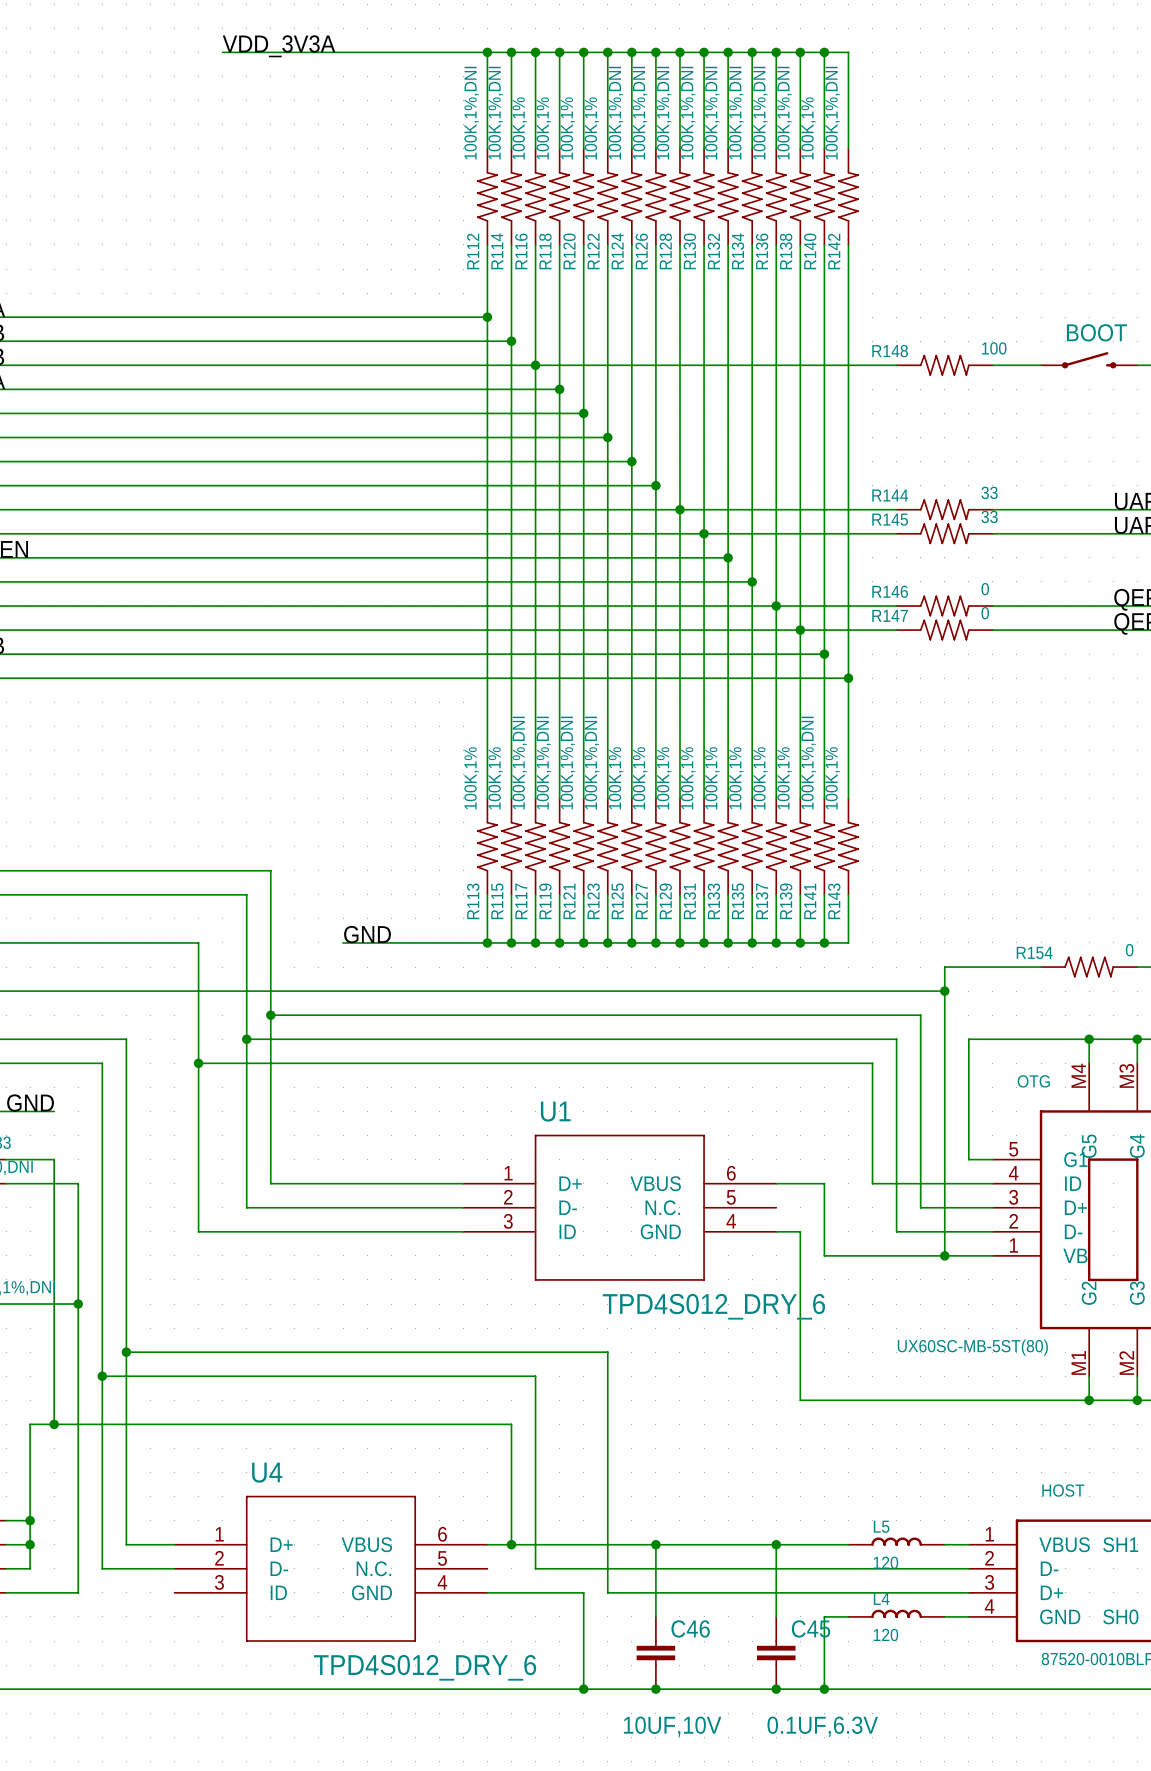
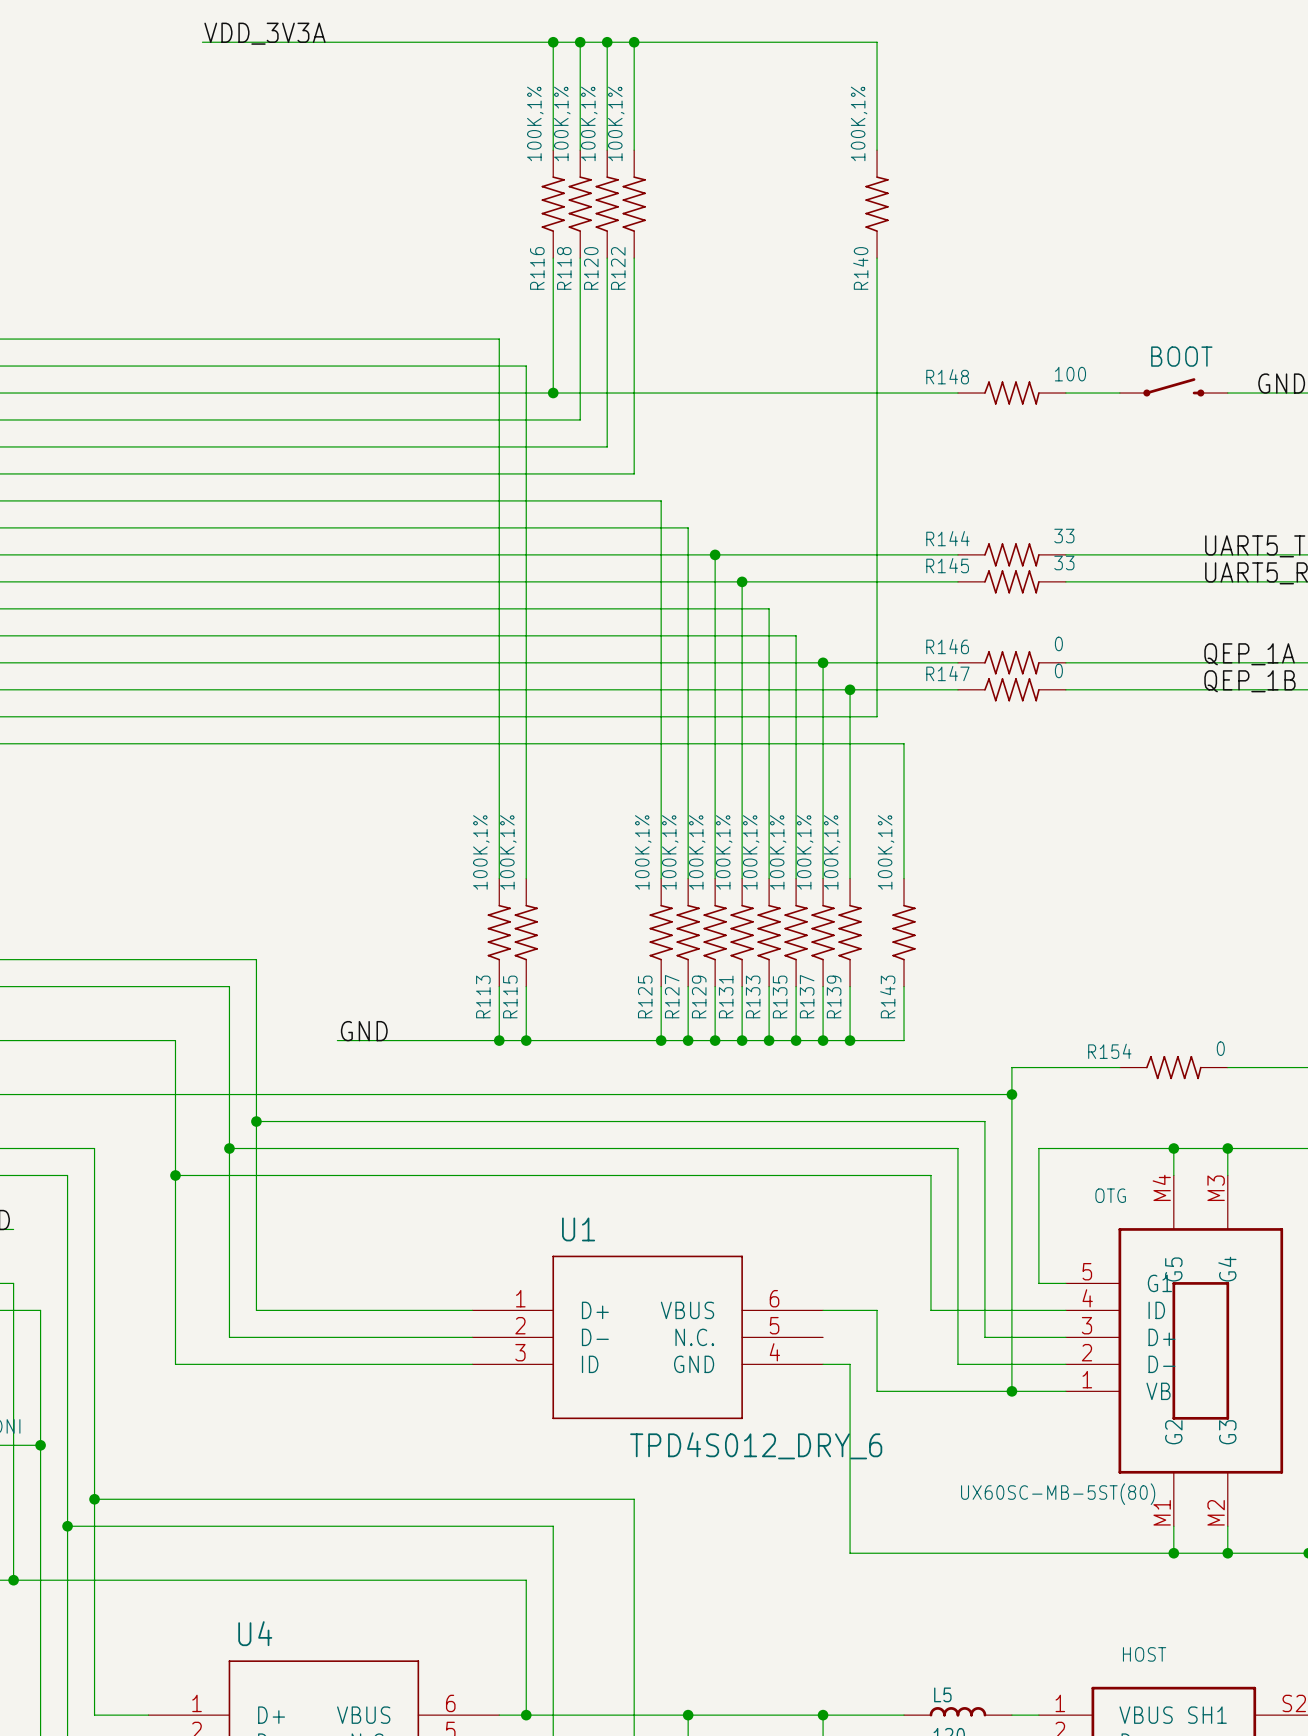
wire: (487, 52) (487, 148) -> none
junction: (487, 52) -> none
wire: (511, 52) (511, 148) -> none
junction: (511, 52) -> none
wire: (631, 52) (631, 148) -> none
junction: (631, 52) -> none
wire: (655, 52) (655, 148) -> none
junction: (655, 52) -> none
wire: (679, 52) (679, 148) -> none
junction: (679, 52) -> none
wire: (704, 52) (704, 148) -> none
junction: (704, 52) -> none
wire: (728, 52) (728, 148) -> none
junction: (728, 52) -> none
wire: (752, 52) (752, 148) -> none
junction: (752, 52) -> none
wire: (776, 52) (776, 148) -> none
junction: (776, 52) -> none
wire: (800, 52) (800, 148) -> none
junction: (800, 52) -> none
wire: (824, 52) (848, 52) (848, 148) -> none
junction: (824, 52) -> none
R112: 100K,1%,DNI (487, 196) -> none
R114: 100K,1%,DNI (511, 196) -> none
R124: 100K,1%,DNI (631, 196) -> none
R126: 100K,1%,DNI (655, 196) -> none
R128: 100K,1%,DNI (679, 196) -> none
R130: 100K,1%,DNI (704, 196) -> none
R132: 100K,1%,DNI (728, 196) -> none
R134: 100K,1%,DNI (752, 196) -> none
R136: 100K,1%,DNI (776, 196) -> none
R138: 100K,1%,DNI (800, 196) -> none
R142: 100K,1%,DNI (848, 196) -> none
wire: (487, 244) (487, 317) -> none
wire: (511, 244) (511, 341) -> none
wire: (631, 244) (631, 461) -> none
wire: (655, 244) (655, 485) -> none
wire: (679, 244) (679, 509) -> none
wire: (704, 244) (704, 533) -> none
wire: (728, 244) (728, 557) -> none
wire: (752, 244) (752, 581) -> none
wire: (776, 244) (776, 606) -> none
wire: (800, 244) (800, 630) -> none
wire: (848, 244) (848, 678) -> none
junction: (487, 317) -> none
junction: (511, 341) -> none
wire: (535, 365) (535, 798) -> none
wire: (559, 389) (559, 798) -> none
junction: (559, 389) -> none
wire: (583, 413) (583, 798) -> none
junction: (583, 413) -> none
wire: (607, 437) (607, 798) -> none
junction: (607, 437) -> none
junction: (631, 461) -> none
junction: (655, 485) -> none
junction: (728, 557) -> none
junction: (752, 581) -> none
wire: (824, 654) (824, 798) -> none
junction: (824, 654) -> none
junction: (848, 678) -> none
R117: 100K,1%,DNI (535, 846) -> none
R119: 100K,1%,DNI (559, 846) -> none
R121: 100K,1%,DNI (583, 846) -> none
R123: 100K,1%,DNI (607, 846) -> none
R141: 100K,1%,DNI (824, 846) -> none
wire: (535, 894) (535, 942) -> none
wire: (559, 894) (559, 942) -> none
wire: (583, 894) (583, 942) -> none
wire: (607, 894) (607, 942) -> none
wire: (824, 894) (824, 942) -> none
junction: (535, 942) -> none
junction: (559, 942) -> none
junction: (583, 942) -> none
junction: (607, 942) -> none
junction: (824, 942) -> none

